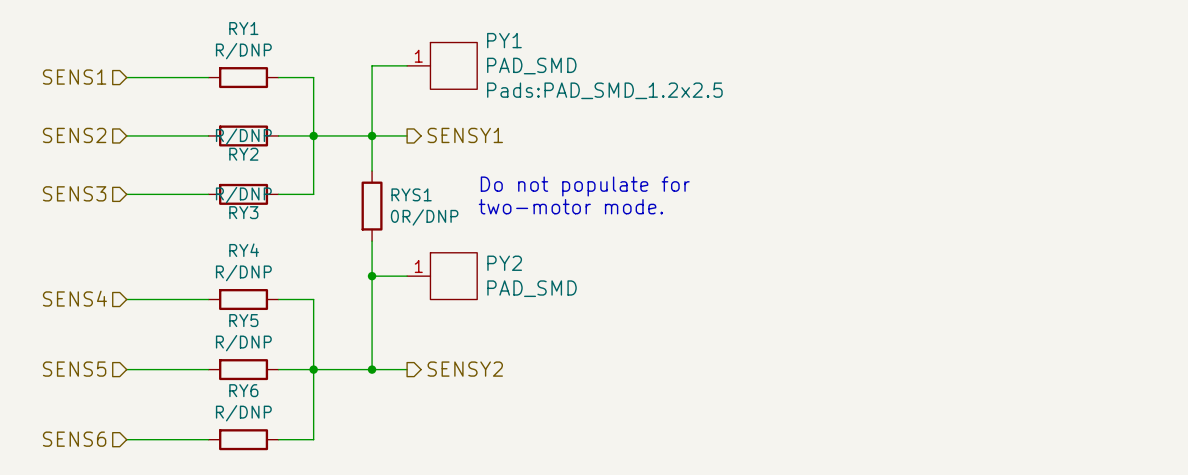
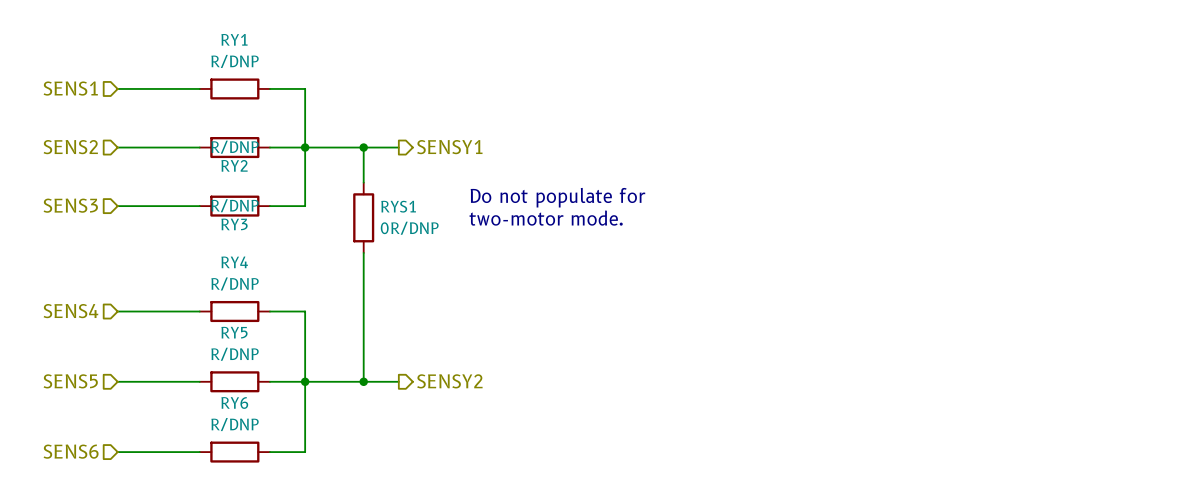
wire: (407, 65) (372, 65) (372, 135) -> none
PY1: PAD_SMD (442, 65) -> none
wire: (372, 276) (407, 276) -> none
junction: (372, 276) -> none
PY2: PAD_SMD (442, 276) -> none

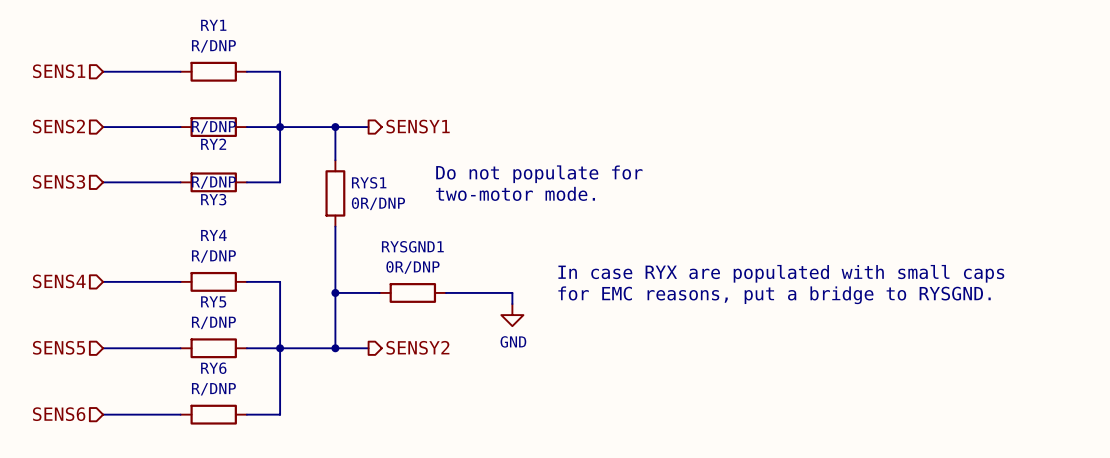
text: none -> In case RYX are populated with small caps (781, 273)
wire: none -> (335, 292) (379, 292)
junction: none -> (335, 292)
RYSGND1: none -> 0R/DNP (412, 292)
wire: none -> (446, 292) (512, 292) (512, 304)
text: none -> for EMC reasons, put a bridge to RYSGND. (774, 295)
power symbol: none -> GND (512, 315)

